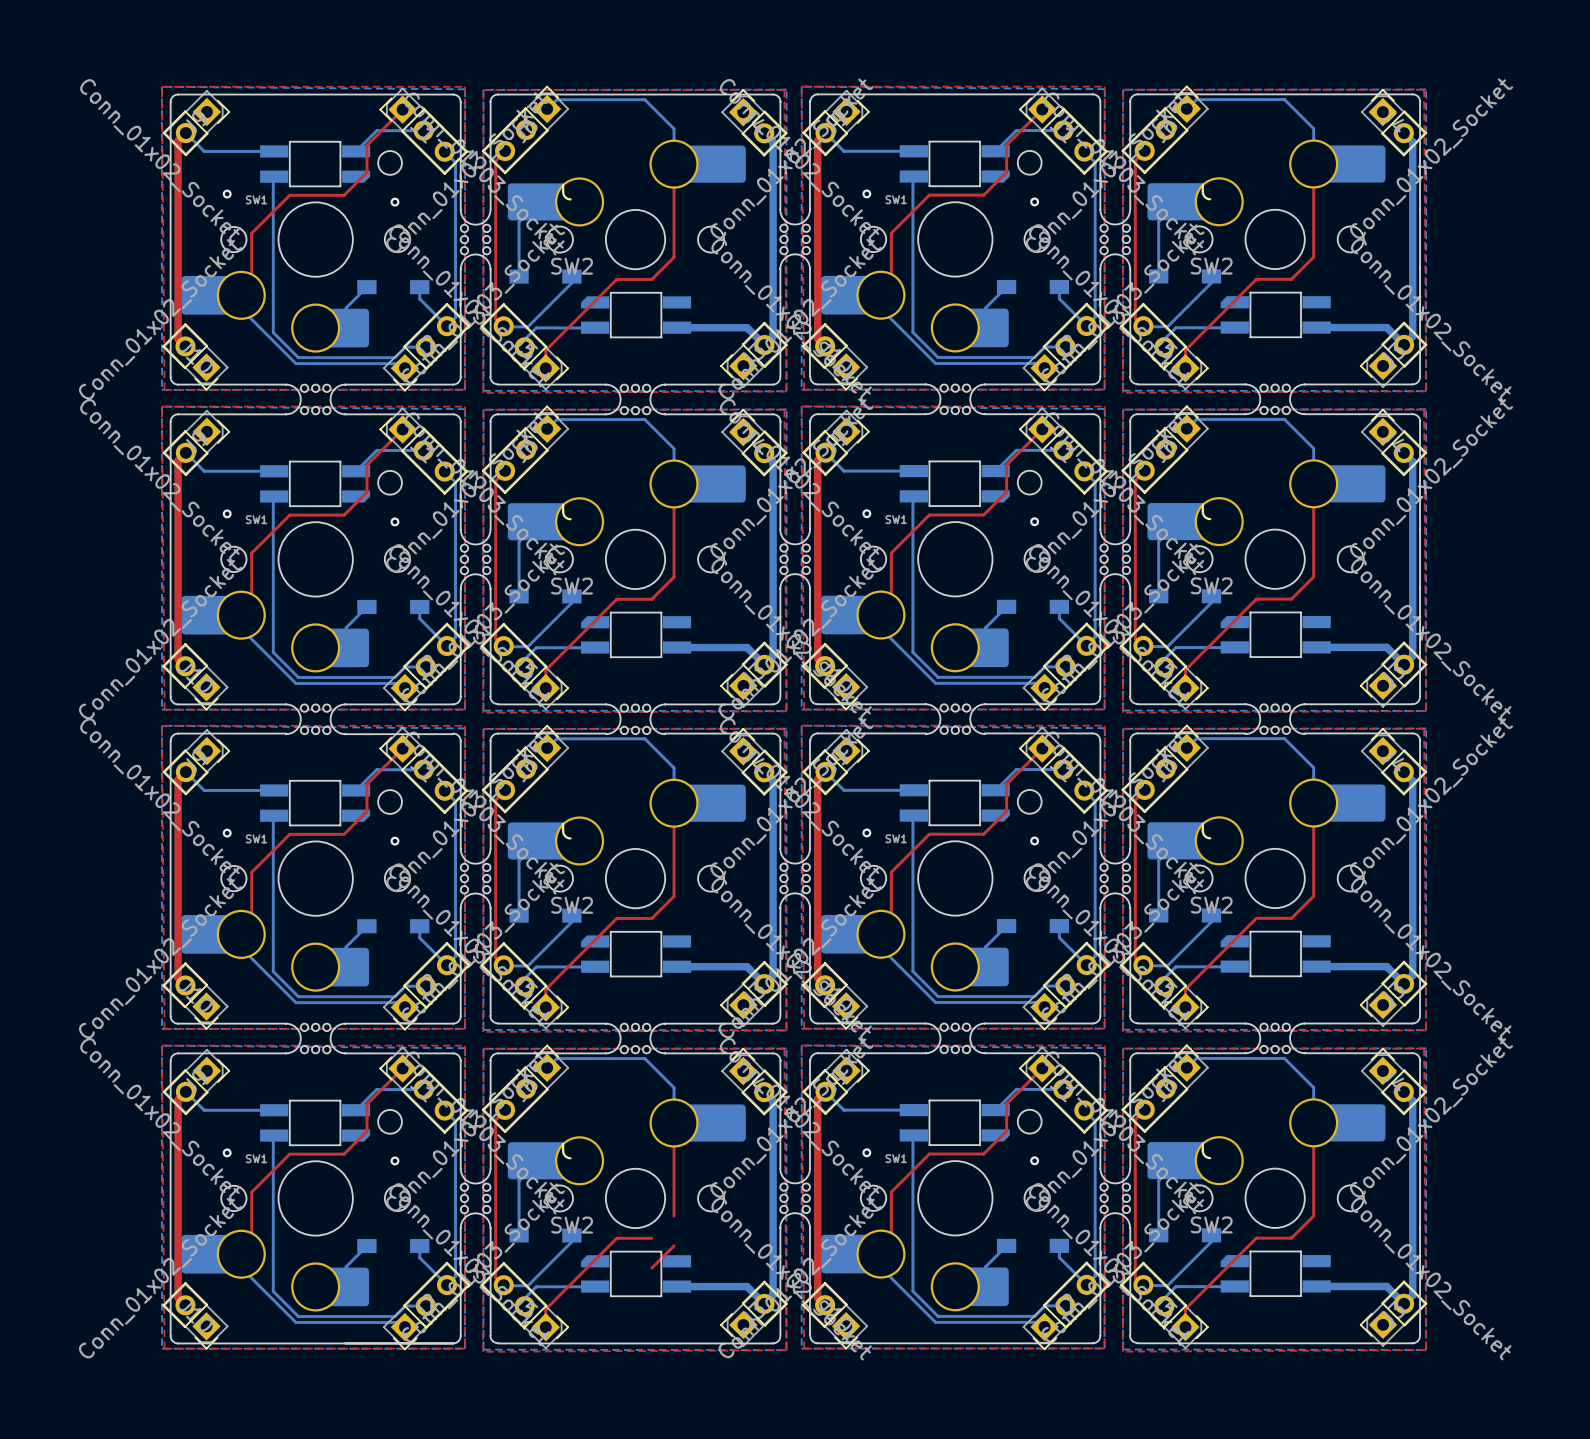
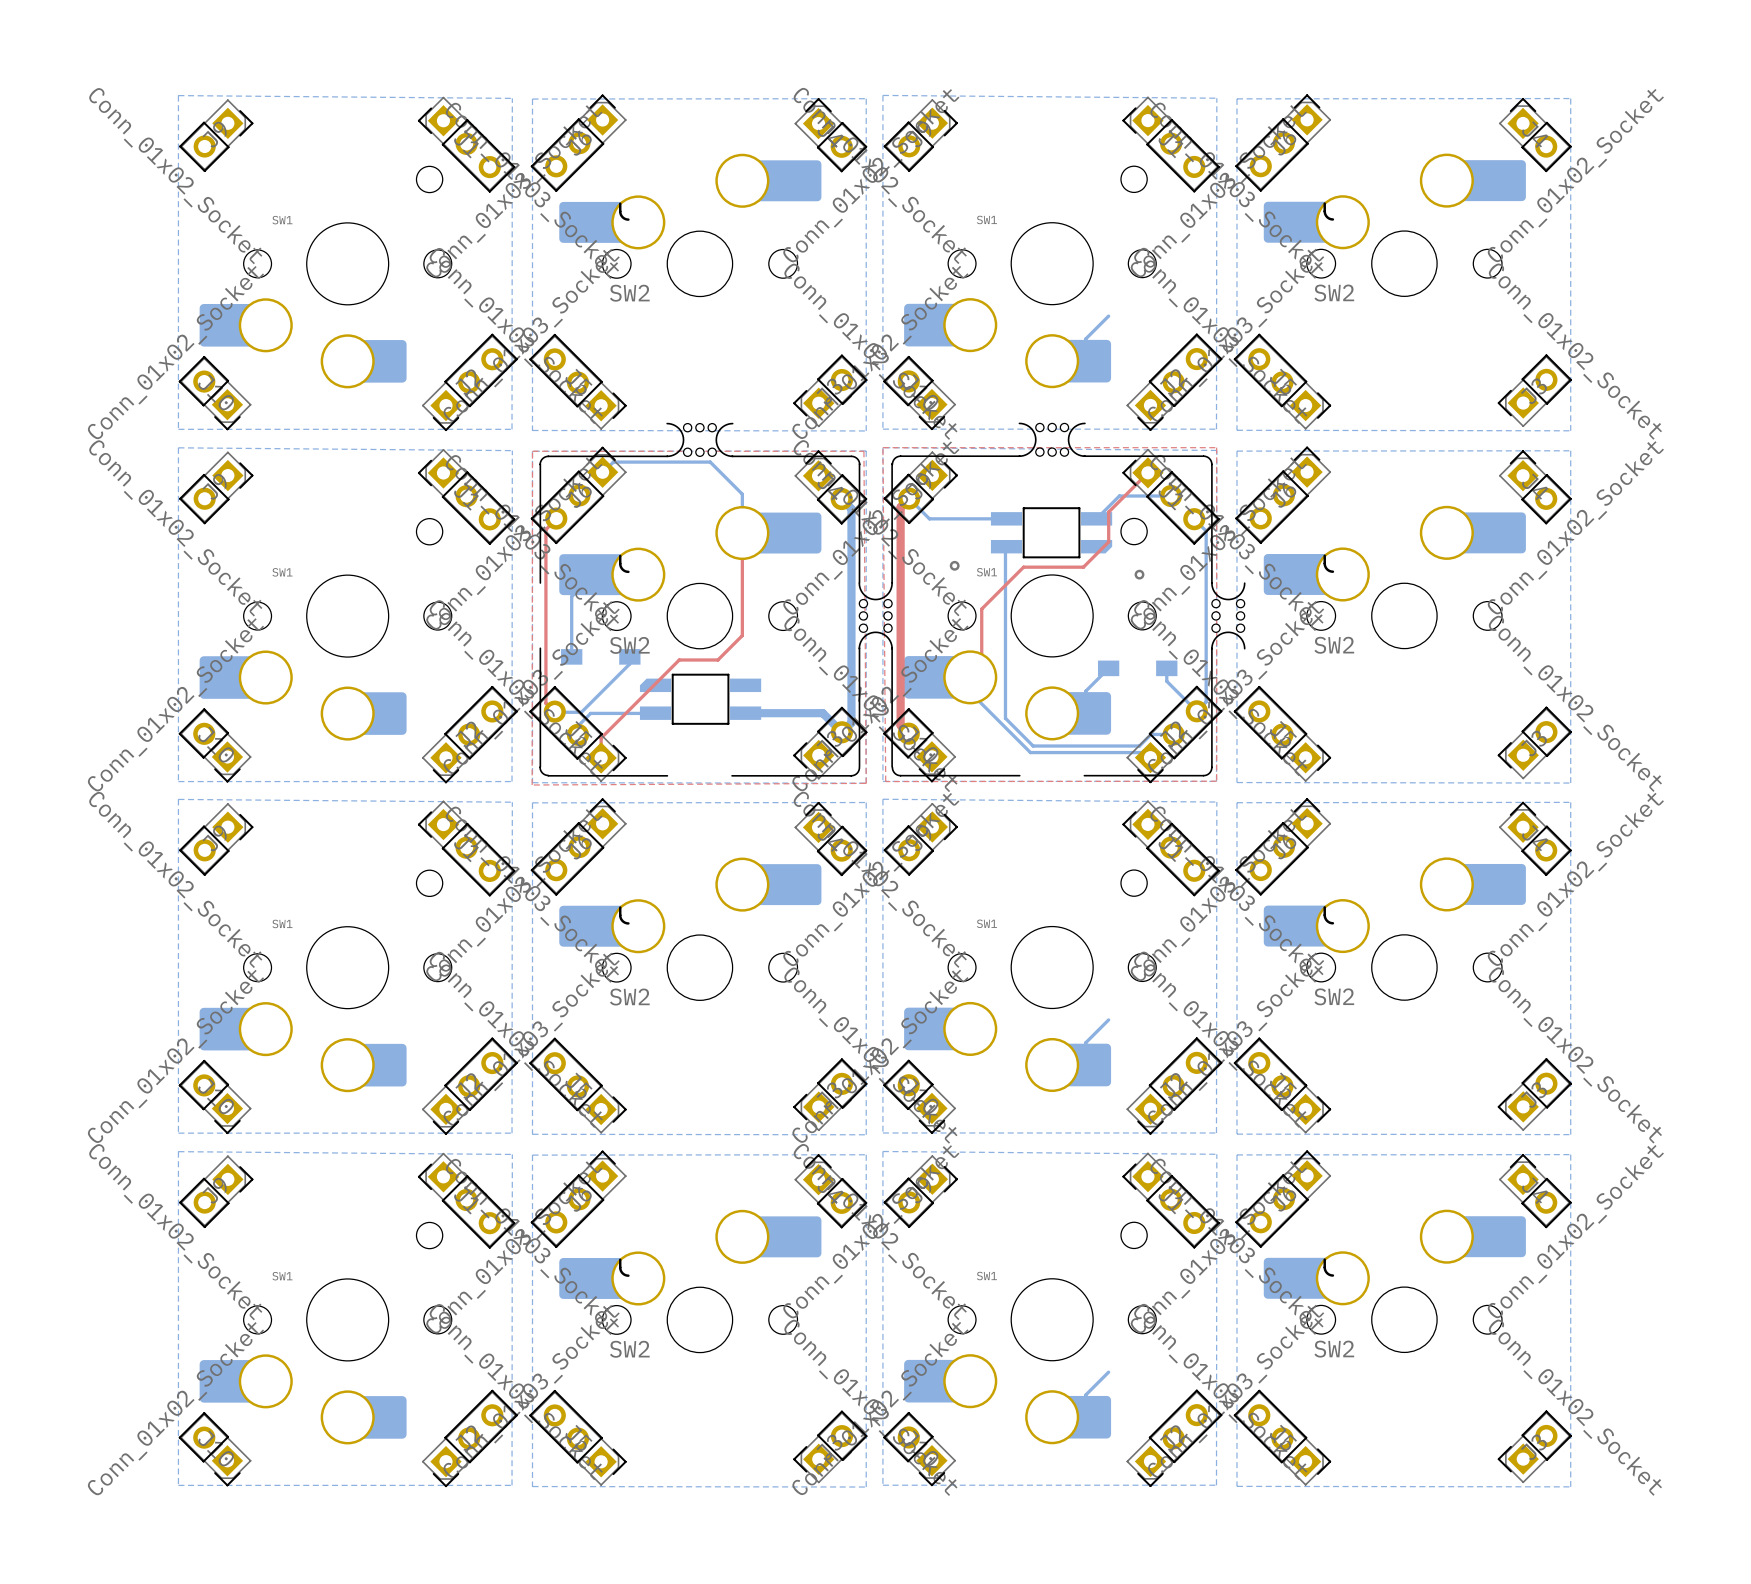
top zone outline: (162, 86) (465, 86) (465, 389) (164, 389) (162, 86) -> none
top zone outline: (801, 86) (1104, 86) (1104, 389) (804, 389) (801, 86) -> none
top zone outline: (483, 89) (784, 89) (786, 391) (483, 392) (483, 89) -> none
top zone outline: (1123, 89) (1424, 89) (1426, 391) (1122, 392) (1123, 89) -> none
board edge: (490, 101) (490, 209) -> none
board edge: (490, 101) (492, 96) (497, 94) (773, 94) (778, 96) (780, 101) -> none
board edge: (780, 101) (780, 209) -> none
board edge: (809, 101) (809, 209) -> none
board edge: (810, 101) (812, 96) (817, 94) (1095, 94) (1100, 101) (1100, 209) -> none
board edge: (1130, 101) (1130, 209) -> none
board edge: (1130, 101) (1132, 96) (1137, 94) (1412, 94) (1418, 96) (1420, 101) -> none
board edge: (1420, 101) (1420, 376) -> none
top track: (402, 109) (367, 145) (367, 172) (344, 195) (289, 195) (251, 233) (251, 284) (241, 295) -> none
bottom track: (547, 109) (556, 99) (644, 99) (674, 128) (674, 164) -> none
top track: (1042, 109) (1006, 145) (1006, 172) (983, 195) (929, 195) (891, 233) (891, 284) (880, 295) -> none
bottom track: (1186, 109) (1196, 99) (1284, 99) (1313, 128) (1313, 164) -> none
bottom track: (423, 130) (376, 130) (356, 151) -> none
bottom track: (1063, 130) (1016, 130) (995, 151) -> none
bottom track: (825, 132) (843, 151) (913, 151) -> none
top track: (825, 132) (817, 140) (817, 338) (825, 345) -> none
bottom track: (185, 133) (204, 151) (274, 151) -> none
top track: (185, 133) (178, 140) (178, 339) (185, 346) -> none
bottom track: (764, 133) (773, 142) (773, 336) (764, 345) (747, 327) (676, 327) -> none
bottom track: (1403, 133) (1412, 141) (1412, 336) (1404, 344) (1386, 327) (1316, 327) -> none
bottom track: (444, 151) (455, 162) (455, 317) (447, 326) (419, 298) (419, 287) -> none
top track: (505, 151) (495, 161) (495, 318) (503, 326) -> none
bottom track: (1084, 151) (1095, 162) (1095, 317) (1086, 326) (1059, 298) (1059, 287) -> none
top track: (1144, 151) (1135, 160) (1135, 318) (1143, 326) -> none
part: (954, 163) -> none
part: (315, 164) -> none
top track: (674, 164) (674, 257) (651, 279) (616, 279) (545, 350) (545, 368) -> none
top track: (1313, 164) (1313, 257) (1291, 279) (1256, 279) (1185, 350) (1185, 368) -> none
bottom track: (274, 176) (273, 332) (298, 357) (394, 357) (405, 347) (425, 347) -> none
bottom track: (913, 176) (912, 332) (938, 357) (1034, 357) (1045, 347) (1065, 347) -> none
via: (866, 193) -> none
via: (227, 194) -> none
bottom track: (539, 201) (519, 221) (519, 276) -> none
via: (1034, 201) -> none
bottom track: (1178, 201) (1158, 221) (1158, 276) -> none
via: (394, 202) -> none
board edge: (460, 209) (460, 101) (456, 95) (178, 94) (172, 96) (170, 101) (171, 380) (178, 384) (286, 384) -> none
part: (475, 239) -> none
part: (795, 239) -> none
part: (1115, 239) -> none
board edge: (490, 268) (490, 376) -> none
board edge: (780, 268) (780, 376) -> none
board edge: (809, 268) (809, 376) -> none
board edge: (1130, 268) (1130, 376) -> none
board edge: (460, 269) (460, 377) -> none
board edge: (1100, 269) (1100, 376) -> none
part: (545, 276) -> none
bottom track: (571, 276) (571, 282) (527, 326) (503, 326) -> none
part: (1185, 276) -> none
bottom track: (1211, 276) (1211, 282) (1167, 326) (1143, 326) -> none
bottom track: (366, 287) (346, 307) (346, 328) -> none
part: (393, 287) -> none
part: (1032, 287) -> none
bottom track: (241, 295) (241, 308) (295, 363) (398, 362) (404, 368) -> none
bottom track: (880, 295) (880, 308) (935, 363) (1038, 362) (1044, 368) -> none
part: (1275, 314) -> none
part: (636, 315) -> none
bottom track: (594, 327) (536, 327) (524, 339) (524, 347) -> none
bottom track: (1234, 327) (1175, 327) (1164, 339) (1164, 347) -> none
board edge: (490, 376) (492, 382) (497, 384) -> none
board edge: (1100, 376) (1098, 382) (1092, 384) -> none
board edge: (1130, 376) (1132, 381) (1137, 384) -> none
board edge: (1419, 376) (1417, 382) (1412, 384) -> none
board edge: (460, 377) (458, 382) (453, 384) -> none
board edge: (780, 377) (778, 382) (772, 384) -> none
board edge: (810, 377) (812, 382) (817, 384) (925, 384) -> none
board edge: (344, 384) (453, 384) -> none
board edge: (497, 384) (605, 384) -> none
board edge: (664, 384) (772, 384) -> none
board edge: (984, 384) (1092, 384) -> none
board edge: (1137, 384) (1245, 384) -> none
board edge: (1304, 384) (1412, 384) -> none
part: (315, 399) -> none
part: (1275, 399) -> none
top zone outline: (162, 406) (465, 406) (465, 709) (164, 709) (162, 406) -> none
top zone outline: (1123, 409) (1424, 409) (1426, 711) (1122, 712) (1123, 409) -> none
board edge: (286, 414) (178, 414) (172, 416) (170, 421) (171, 699) (178, 704) (286, 704) -> none
board edge: (344, 414) (453, 414) -> none
board edge: (453, 414) (458, 416) (460, 421) (460, 529) -> none
board edge: (1245, 414) (1137, 414) (1132, 416) (1130, 421) -> none
board edge: (1304, 414) (1412, 414) -> none
board edge: (1412, 414) (1418, 416) (1420, 421) -> none
board edge: (1130, 421) (1130, 529) -> none
board edge: (1420, 421) (1420, 696) -> none
top track: (402, 429) (367, 465) (367, 492) (344, 515) (289, 515) (251, 553) (251, 604) (241, 615) -> none
bottom track: (1186, 429) (1196, 419) (1284, 419) (1313, 448) (1313, 483) -> none
bottom track: (423, 450) (376, 450) (356, 471) -> none
bottom track: (185, 452) (204, 471) (274, 471) -> none
top track: (185, 452) (178, 460) (178, 658) (185, 665) -> none
bottom track: (1403, 452) (1412, 461) (1412, 656) (1404, 664) (1386, 647) (1316, 647) -> none
bottom track: (444, 471) (455, 482) (455, 637) (447, 645) (419, 618) (419, 606) -> none
top track: (1144, 471) (1135, 480) (1135, 638) (1143, 646) -> none
part: (315, 483) -> none
top track: (1313, 483) (1313, 576) (1291, 599) (1256, 599) (1185, 670) (1185, 688) -> none
bottom track: (274, 496) (273, 652) (298, 677) (394, 677) (405, 667) (425, 667) -> none
via: (227, 513) -> none
via: (394, 521) -> none
bottom track: (1178, 521) (1158, 541) (1158, 596) -> none
part: (475, 559) -> none
board edge: (460, 588) (460, 696) -> none
board edge: (1130, 588) (1130, 696) -> none
part: (1185, 596) -> none
bottom track: (1211, 596) (1211, 602) (1167, 646) (1143, 646) -> none
bottom track: (366, 606) (346, 627) (346, 647) -> none
part: (393, 606) -> none
bottom track: (241, 615) (241, 628) (295, 683) (398, 682) (404, 688) -> none
part: (1275, 634) -> none
bottom track: (1234, 647) (1175, 647) (1164, 659) (1164, 667) -> none
board edge: (460, 696) (458, 702) (453, 704) -> none
board edge: (1130, 696) (1132, 701) (1137, 703) -> none
board edge: (1419, 696) (1417, 702) (1412, 704) -> none
board edge: (344, 704) (453, 704) -> none
board edge: (1137, 704) (1245, 704) -> none
board edge: (1304, 704) (1412, 704) -> none
part: (315, 719) -> none
part: (635, 719) -> none
part: (955, 719) -> none
part: (1275, 719) -> none
top zone outline: (162, 725) (465, 725) (465, 1028) (164, 1029) (162, 725) -> none
top zone outline: (801, 725) (1104, 725) (1104, 1028) (804, 1028) (801, 725) -> none
top zone outline: (483, 728) (784, 728) (786, 1030) (483, 1031) (483, 728) -> none
top zone outline: (1123, 728) (1424, 728) (1426, 1030) (1122, 1031) (1123, 728) -> none
board edge: (286, 733) (178, 733) (172, 735) (170, 741) (171, 1019) (178, 1023) (286, 1023) -> none
board edge: (453, 733) (458, 735) (460, 741) (460, 848) -> none
board edge: (605, 733) (497, 733) (492, 735) (490, 741) -> none
board edge: (664, 733) (772, 733) -> none
board edge: (773, 733) (778, 735) (780, 741) -> none
board edge: (925, 733) (817, 733) (812, 735) (810, 740) -> none
board edge: (984, 733) (1092, 733) -> none
board edge: (1092, 733) (1098, 735) (1100, 740) (1100, 848) -> none
board edge: (1245, 733) (1137, 733) (1132, 735) (1130, 740) -> none
board edge: (1304, 733) (1412, 733) -> none
board edge: (1412, 733) (1418, 735) (1420, 740) -> none
board edge: (344, 734) (453, 734) -> none
board edge: (490, 740) (490, 848) -> none
board edge: (780, 740) (780, 848) -> none
board edge: (809, 740) (809, 848) -> none
board edge: (1130, 740) (1130, 848) -> none
board edge: (1420, 740) (1420, 1015) -> none
top track: (402, 748) (367, 784) (367, 811) (344, 834) (289, 834) (251, 872) (251, 923) (241, 934) -> none
bottom track: (547, 748) (556, 738) (644, 738) (674, 767) (674, 803) -> none
top track: (1042, 748) (1006, 784) (1006, 811) (983, 834) (929, 834) (891, 872) (891, 923) (880, 934) -> none
bottom track: (1186, 748) (1196, 738) (1284, 738) (1313, 767) (1313, 803) -> none
bottom track: (423, 769) (376, 769) (356, 790) -> none
bottom track: (1063, 769) (1016, 769) (995, 790) -> none
bottom track: (825, 771) (843, 790) (913, 790) -> none
top track: (825, 771) (817, 779) (817, 977) (825, 984) -> none
bottom track: (185, 772) (204, 790) (274, 790) -> none
top track: (185, 772) (178, 779) (178, 978) (185, 985) -> none
bottom track: (764, 772) (773, 781) (773, 975) (764, 984) (747, 966) (676, 966) -> none
bottom track: (1403, 772) (1412, 781) (1412, 975) (1404, 983) (1386, 966) (1316, 966) -> none
bottom track: (444, 790) (455, 801) (455, 956) (447, 965) (419, 937) (419, 926) -> none
top track: (505, 790) (495, 800) (495, 957) (503, 965) -> none
bottom track: (1084, 790) (1095, 801) (1095, 956) (1086, 965) (1059, 937) (1059, 926) -> none
top track: (1144, 790) (1135, 799) (1135, 957) (1143, 965) -> none
part: (954, 802) -> none
part: (315, 803) -> none
top track: (674, 803) (674, 896) (651, 918) (616, 918) (545, 989) (545, 1008) -> none
top track: (1313, 803) (1313, 896) (1291, 918) (1256, 918) (1185, 989) (1185, 1007) -> none
bottom track: (274, 815) (273, 971) (298, 996) (394, 996) (405, 986) (425, 986) -> none
bottom track: (913, 815) (912, 971) (938, 996) (1034, 996) (1045, 986) (1065, 986) -> none
via: (866, 832) -> none
via: (227, 833) -> none
bottom track: (539, 840) (519, 860) (519, 915) -> none
via: (1034, 840) -> none
bottom track: (1178, 840) (1158, 860) (1158, 915) -> none
via: (394, 841) -> none
part: (475, 878) -> none
part: (795, 878) -> none
part: (1115, 878) -> none
board edge: (490, 907) (490, 1015) -> none
board edge: (780, 907) (780, 1015) -> none
board edge: (809, 907) (809, 1015) -> none
board edge: (1130, 907) (1130, 1015) -> none
board edge: (460, 908) (460, 1016) -> none
board edge: (1100, 908) (1100, 1015) -> none
part: (545, 915) -> none
bottom track: (571, 915) (571, 922) (527, 965) (503, 965) -> none
part: (1185, 915) -> none
bottom track: (1211, 915) (1211, 921) (1167, 965) (1143, 965) -> none
bottom track: (366, 926) (346, 947) (346, 967) -> none
part: (393, 926) -> none
part: (1032, 926) -> none
bottom track: (241, 934) (241, 948) (295, 1002) (398, 1001) (404, 1007) -> none
bottom track: (880, 934) (880, 947) (935, 1002) (1038, 1001) (1044, 1007) -> none
part: (1275, 953) -> none
part: (636, 954) -> none
bottom track: (594, 966) (536, 966) (524, 978) (524, 986) -> none
bottom track: (1234, 966) (1175, 966) (1164, 978) (1164, 986) -> none
board edge: (490, 1015) (492, 1021) (497, 1023) -> none
board edge: (1130, 1015) (1132, 1020) (1137, 1023) -> none
board edge: (460, 1016) (458, 1021) (453, 1023) -> none
board edge: (780, 1016) (778, 1021) (772, 1023) -> none
board edge: (810, 1016) (812, 1021) (817, 1023) (925, 1023) -> none
board edge: (1100, 1016) (1098, 1021) (1092, 1023) -> none
board edge: (1419, 1016) (1417, 1021) (1412, 1023) -> none
board edge: (344, 1023) (453, 1023) -> none
board edge: (497, 1023) (605, 1023) -> none
board edge: (664, 1023) (772, 1023) -> none
board edge: (984, 1023) (1092, 1023) -> none
board edge: (1137, 1023) (1245, 1023) -> none
board edge: (1304, 1023) (1412, 1023) -> none
part: (315, 1038) -> none
part: (635, 1038) -> none
part: (955, 1038) -> none
part: (1275, 1038) -> none
top zone outline: (162, 1045) (465, 1045) (465, 1348) (164, 1348) (162, 1045) -> none
top zone outline: (801, 1045) (1104, 1045) (1104, 1348) (804, 1348) (801, 1045) -> none
top zone outline: (483, 1048) (784, 1048) (786, 1350) (483, 1351) (483, 1048) -> none
top zone outline: (1123, 1048) (1424, 1048) (1426, 1350) (1122, 1351) (1123, 1048) -> none
board edge: (286, 1053) (178, 1053) (171, 1057) (171, 1339) (178, 1343) (453, 1343) (458, 1341) (460, 1335) -> none
board edge: (344, 1053) (453, 1053) -> none
board edge: (453, 1053) (458, 1055) (460, 1060) (460, 1168) -> none
board edge: (605, 1053) (497, 1053) (492, 1055) (490, 1060) -> none
board edge: (664, 1053) (772, 1053) -> none
board edge: (773, 1053) (778, 1055) (780, 1060) -> none
board edge: (925, 1053) (817, 1053) (812, 1055) (810, 1060) -> none
board edge: (984, 1053) (1092, 1053) -> none
board edge: (1092, 1053) (1098, 1055) (1100, 1060) (1100, 1168) -> none
board edge: (1245, 1053) (1137, 1053) (1132, 1055) (1130, 1060) -> none
board edge: (1304, 1053) (1412, 1053) -> none
board edge: (1412, 1053) (1418, 1055) (1420, 1060) -> none
board edge: (490, 1060) (490, 1168) -> none
board edge: (780, 1060) (780, 1168) -> none
board edge: (809, 1060) (809, 1168) -> none
board edge: (1130, 1060) (1130, 1168) -> none
board edge: (1420, 1060) (1420, 1335) -> none
top track: (402, 1068) (367, 1104) (367, 1131) (344, 1154) (289, 1154) (251, 1192) (251, 1243) (241, 1254) -> none
bottom track: (547, 1068) (556, 1058) (644, 1058) (674, 1087) (674, 1123) -> none
top track: (1042, 1068) (1006, 1104) (1006, 1131) (983, 1154) (929, 1154) (891, 1192) (891, 1243) (880, 1254) -> none
bottom track: (1186, 1068) (1196, 1058) (1284, 1058) (1313, 1087) (1313, 1122) -> none
bottom track: (423, 1089) (376, 1089) (356, 1110) -> none
bottom track: (1063, 1089) (1016, 1089) (995, 1110) -> none
bottom track: (185, 1091) (204, 1110) (274, 1110) -> none
top track: (185, 1091) (178, 1099) (178, 1297) (185, 1304) -> none
bottom track: (825, 1091) (843, 1110) (913, 1110) -> none
top track: (825, 1091) (817, 1099) (817, 1297) (825, 1304) -> none
bottom track: (1403, 1091) (1412, 1100) (1412, 1295) (1404, 1303) (1386, 1286) (1316, 1286) -> none
bottom track: (764, 1092) (773, 1101) (773, 1295) (764, 1303) (747, 1286) (676, 1286) -> none
bottom track: (444, 1110) (455, 1121) (455, 1276) (447, 1285) (419, 1257) (419, 1246) -> none
top track: (505, 1110) (495, 1119) (495, 1277) (503, 1285) -> none
bottom track: (1084, 1110) (1095, 1121) (1095, 1276) (1086, 1284) (1059, 1257) (1059, 1245) -> none
top track: (1144, 1110) (1135, 1119) (1135, 1277) (1143, 1285) -> none
part: (315, 1122) -> none
part: (954, 1122) -> none
top track: (1313, 1122) (1313, 1215) (1291, 1238) (1256, 1238) (1185, 1309) (1185, 1327) -> none
top track: (674, 1123) (674, 1216) -> none
bottom track: (274, 1135) (273, 1291) (298, 1316) (394, 1316) (405, 1306) (425, 1306) -> none
bottom track: (913, 1135) (912, 1291) (938, 1316) (1034, 1316) (1045, 1305) (1065, 1305) -> none
via: (227, 1152) -> none
via: (866, 1152) -> none
via: (394, 1160) -> none
bottom track: (539, 1160) (519, 1180) (519, 1235) -> none
via: (1034, 1160) -> none
bottom track: (1178, 1160) (1158, 1180) (1158, 1235) -> none
part: (475, 1198) -> none
part: (795, 1198) -> none
part: (1115, 1198) -> none
board edge: (490, 1227) (490, 1335) -> none
board edge: (780, 1227) (780, 1335) -> none
board edge: (809, 1227) (809, 1335) -> none
board edge: (1100, 1227) (1100, 1335) -> none
board edge: (1130, 1227) (1130, 1335) -> none
board edge: (460, 1228) (460, 1335) -> none
part: (545, 1235) -> none
bottom track: (571, 1235) (571, 1241) (527, 1285) (503, 1285) -> none
part: (1185, 1235) -> none
bottom track: (1211, 1235) (1211, 1241) (1167, 1285) (1143, 1285) -> none
top track: (651, 1238) (616, 1238) (545, 1309) (545, 1327) -> none
top track: (674, 1245) (651, 1268) -> none
part: (1032, 1245) -> none
bottom track: (366, 1246) (346, 1266) (346, 1286) -> none
part: (393, 1246) -> none
bottom track: (241, 1254) (241, 1267) (295, 1322) (398, 1321) (404, 1327) -> none
bottom track: (880, 1254) (880, 1267) (935, 1322) (1038, 1320) (1044, 1326) -> none
part: (636, 1273) -> none
part: (1275, 1273) -> none
bottom track: (594, 1286) (536, 1286) (524, 1298) (524, 1306) -> none
bottom track: (1234, 1286) (1175, 1286) (1164, 1298) (1164, 1306) -> none
board edge: (490, 1335) (492, 1340) (497, 1343) -> none
board edge: (780, 1335) (778, 1341) (772, 1343) -> none
board edge: (810, 1335) (812, 1341) (817, 1343) (1092, 1343) (1098, 1341) (1100, 1335) -> none
board edge: (1130, 1335) (1132, 1340) (1137, 1342) -> none
board edge: (1419, 1335) (1417, 1341) (1412, 1343) -> none
board edge: (497, 1343) (773, 1343) -> none
board edge: (1137, 1343) (1412, 1343) -> none

